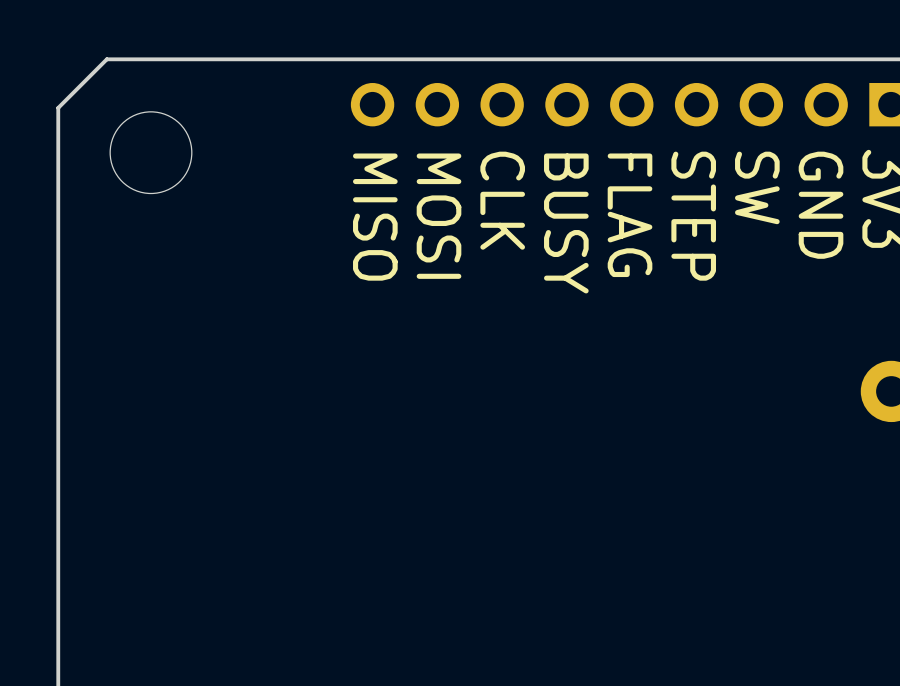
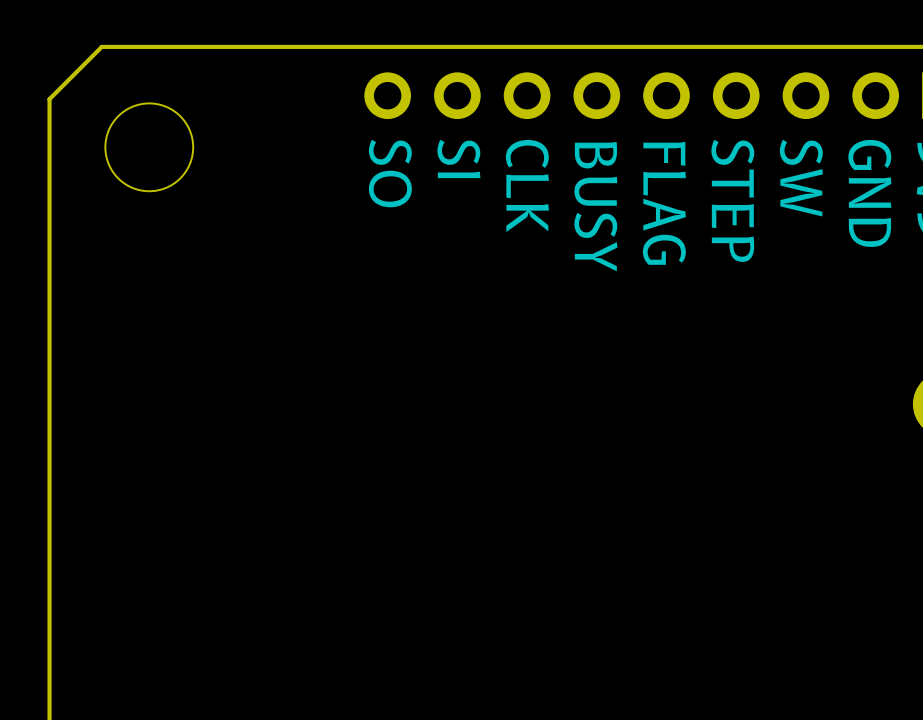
text: MOSI (439, 216) -> SI (458, 158)
text: MISO (375, 217) -> SO (390, 173)

